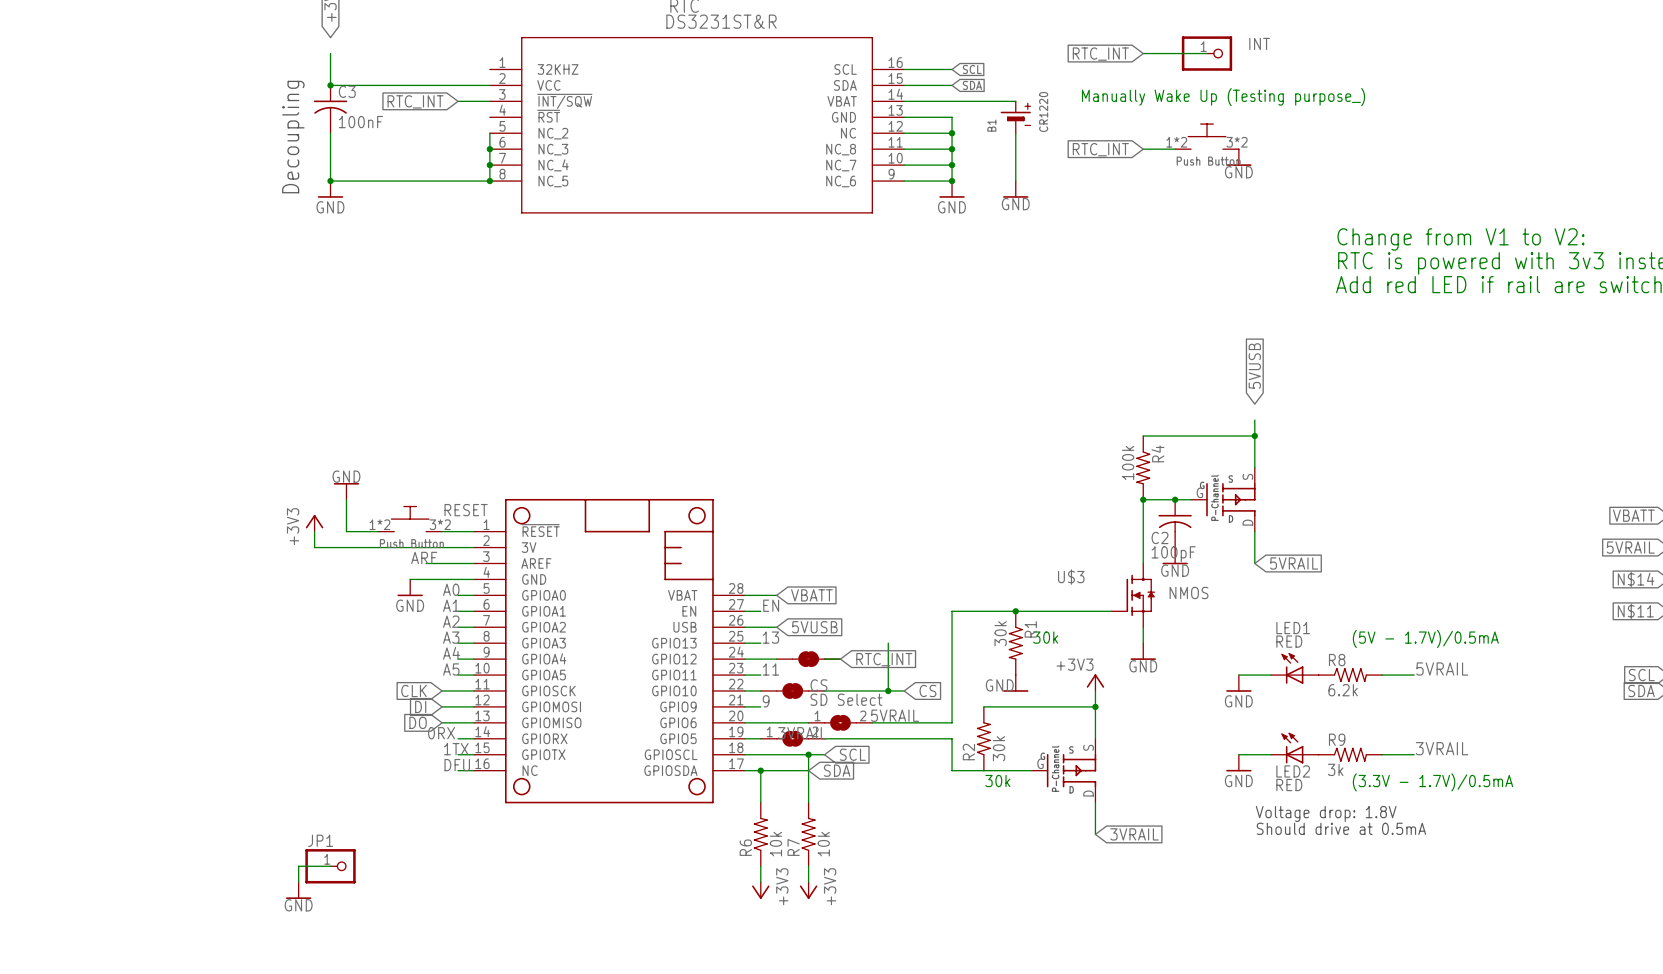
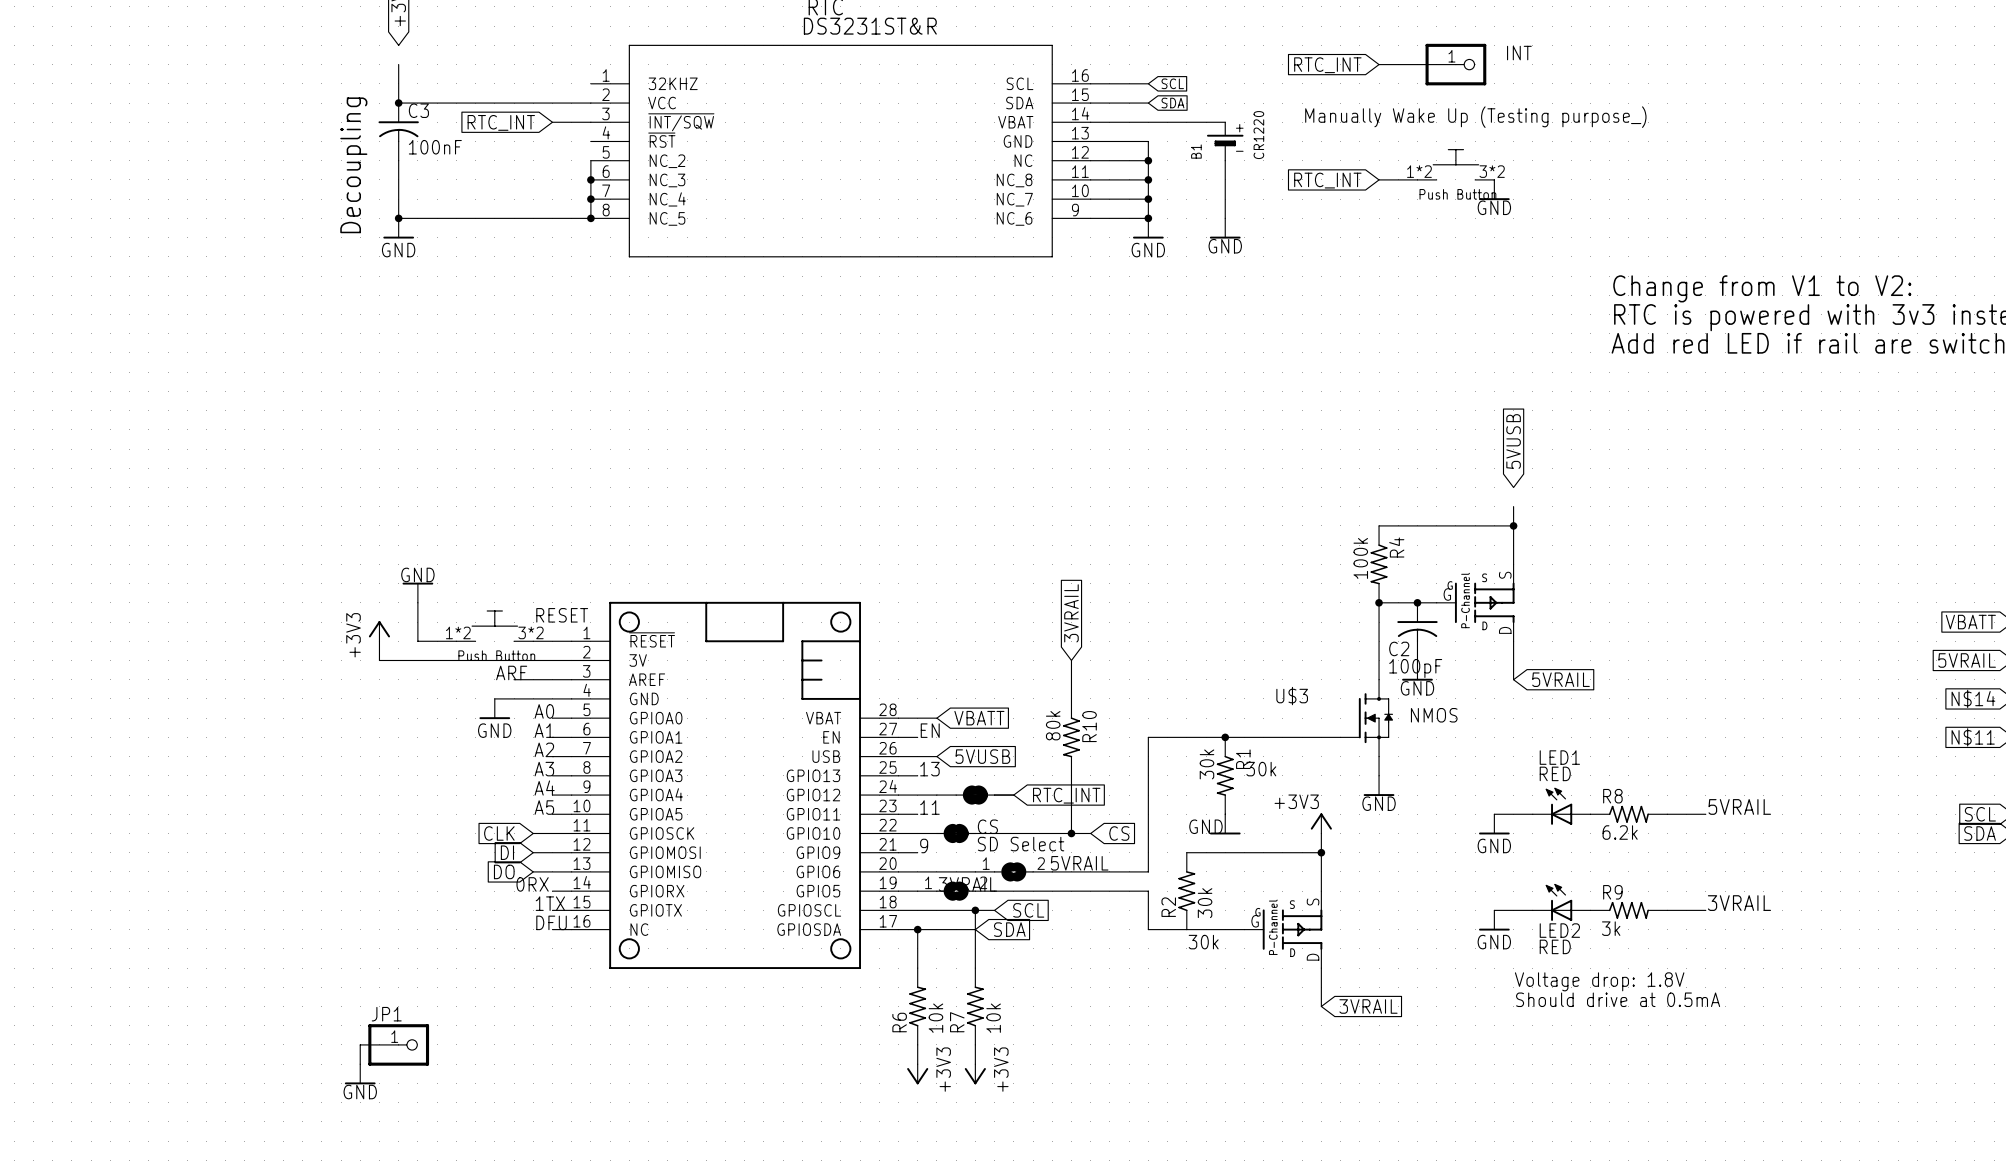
global label: none -> 3VRAIL (1071, 613)
wire: none -> (1071, 660) (1071, 698)
R10: none -> 80k (1071, 737)
text: (5V - 1.7V)/0.5mA (1425, 638) -> none
text: (3.3V - 1.7V)/0.5mA (1433, 782) -> none

